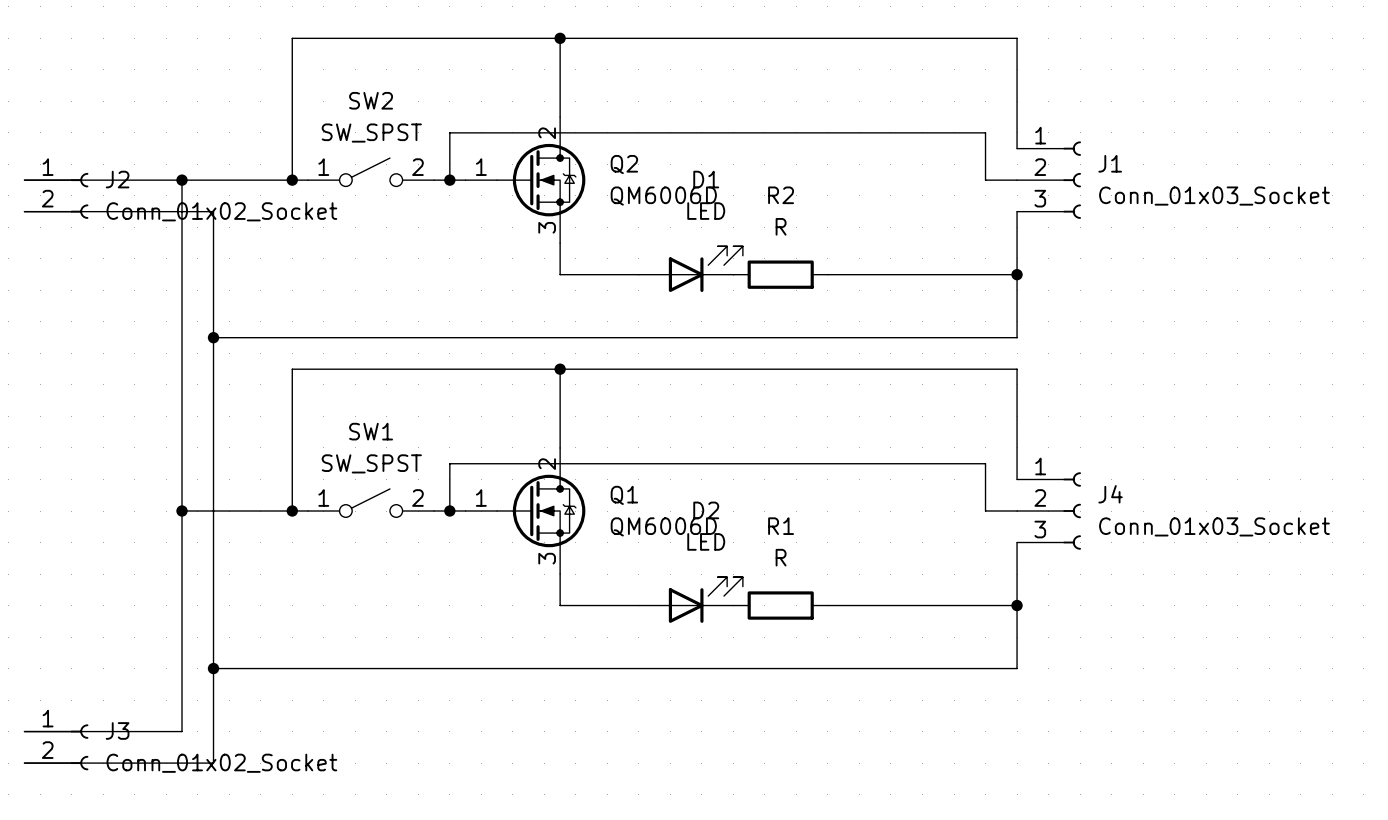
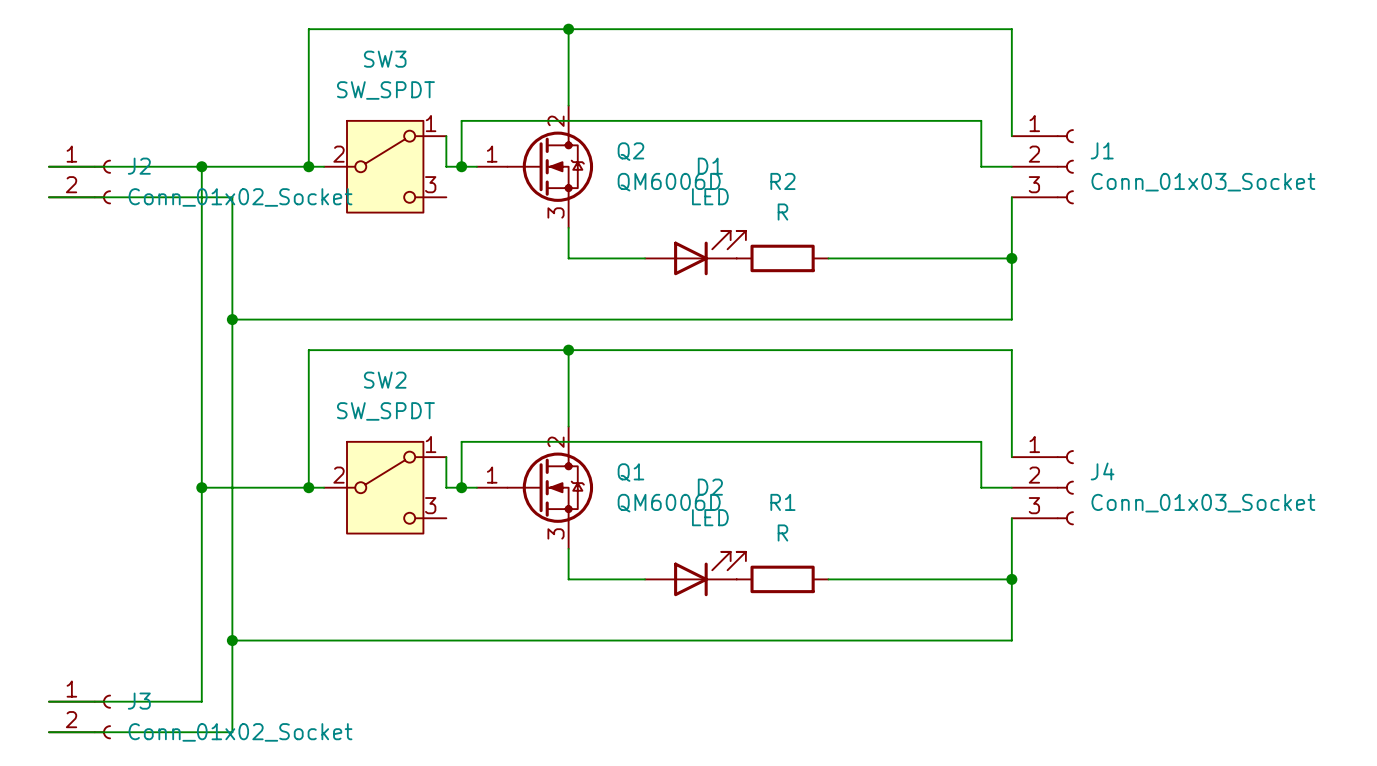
SW2 name position: SW2 (371, 100) -> SW2 (385, 380)
SW2 value: SW_SPST (371, 133) -> SW_SPDT (385, 411)
wire: none -> (446, 136) (446, 166)
SW2 symbol: [308, 158, 435, 187] -> [324, 441, 447, 534]
SW3: none -> SW_SPDT (385, 166)
wire: none -> (446, 457) (446, 487)
SW1: SW_SPST (371, 503) -> none

